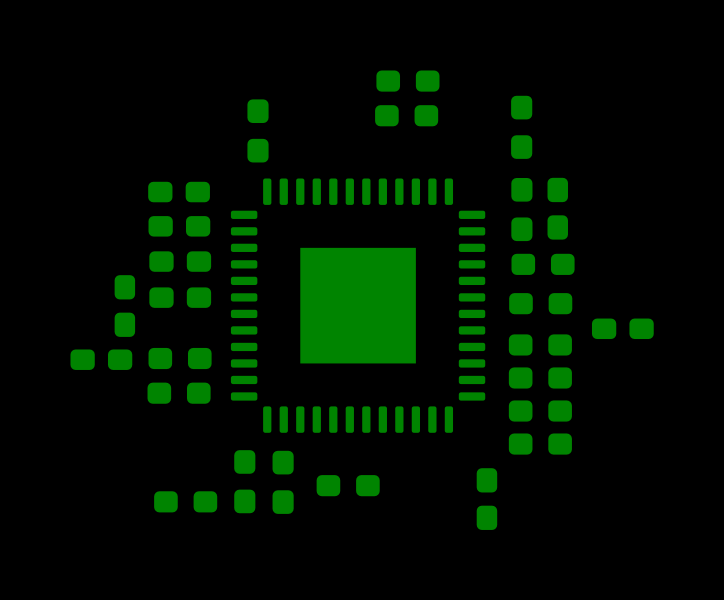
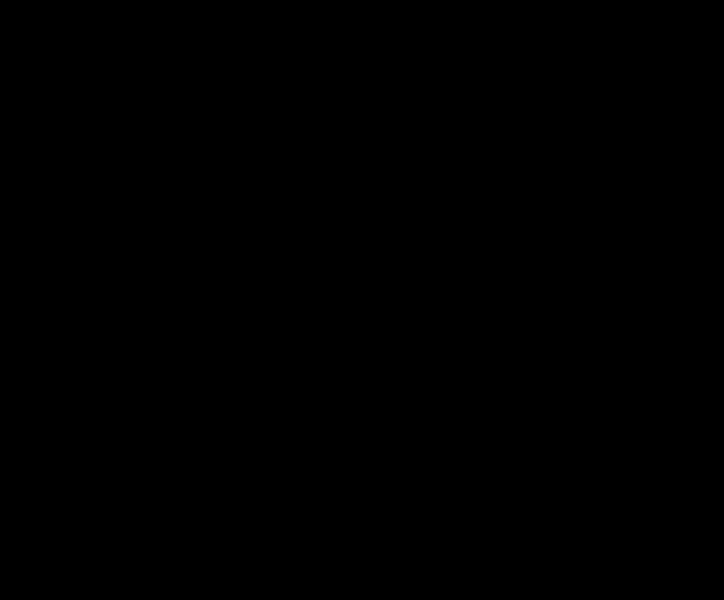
part: (407, 81) -> none
part: (406, 115) -> none
part: (521, 127) -> none
part: (258, 130) -> none
part: (179, 192) -> none
part: (557, 208) -> none
part: (521, 209) -> none
part: (179, 226) -> none
part: (180, 261) -> none
part: (543, 264) -> none
part: (180, 297) -> none
part: (540, 303) -> none
part: (358, 305) -> none
part: (124, 306) -> none
part: (622, 328) -> none
part: (540, 344) -> none
part: (180, 358) -> none
part: (101, 359) -> none
part: (540, 377) -> none
part: (179, 393) -> none
part: (540, 411) -> none
part: (540, 444) -> none
part: (244, 481) -> none
part: (283, 482) -> none
part: (348, 485) -> none
part: (486, 499) -> none
part: (185, 501) -> none

